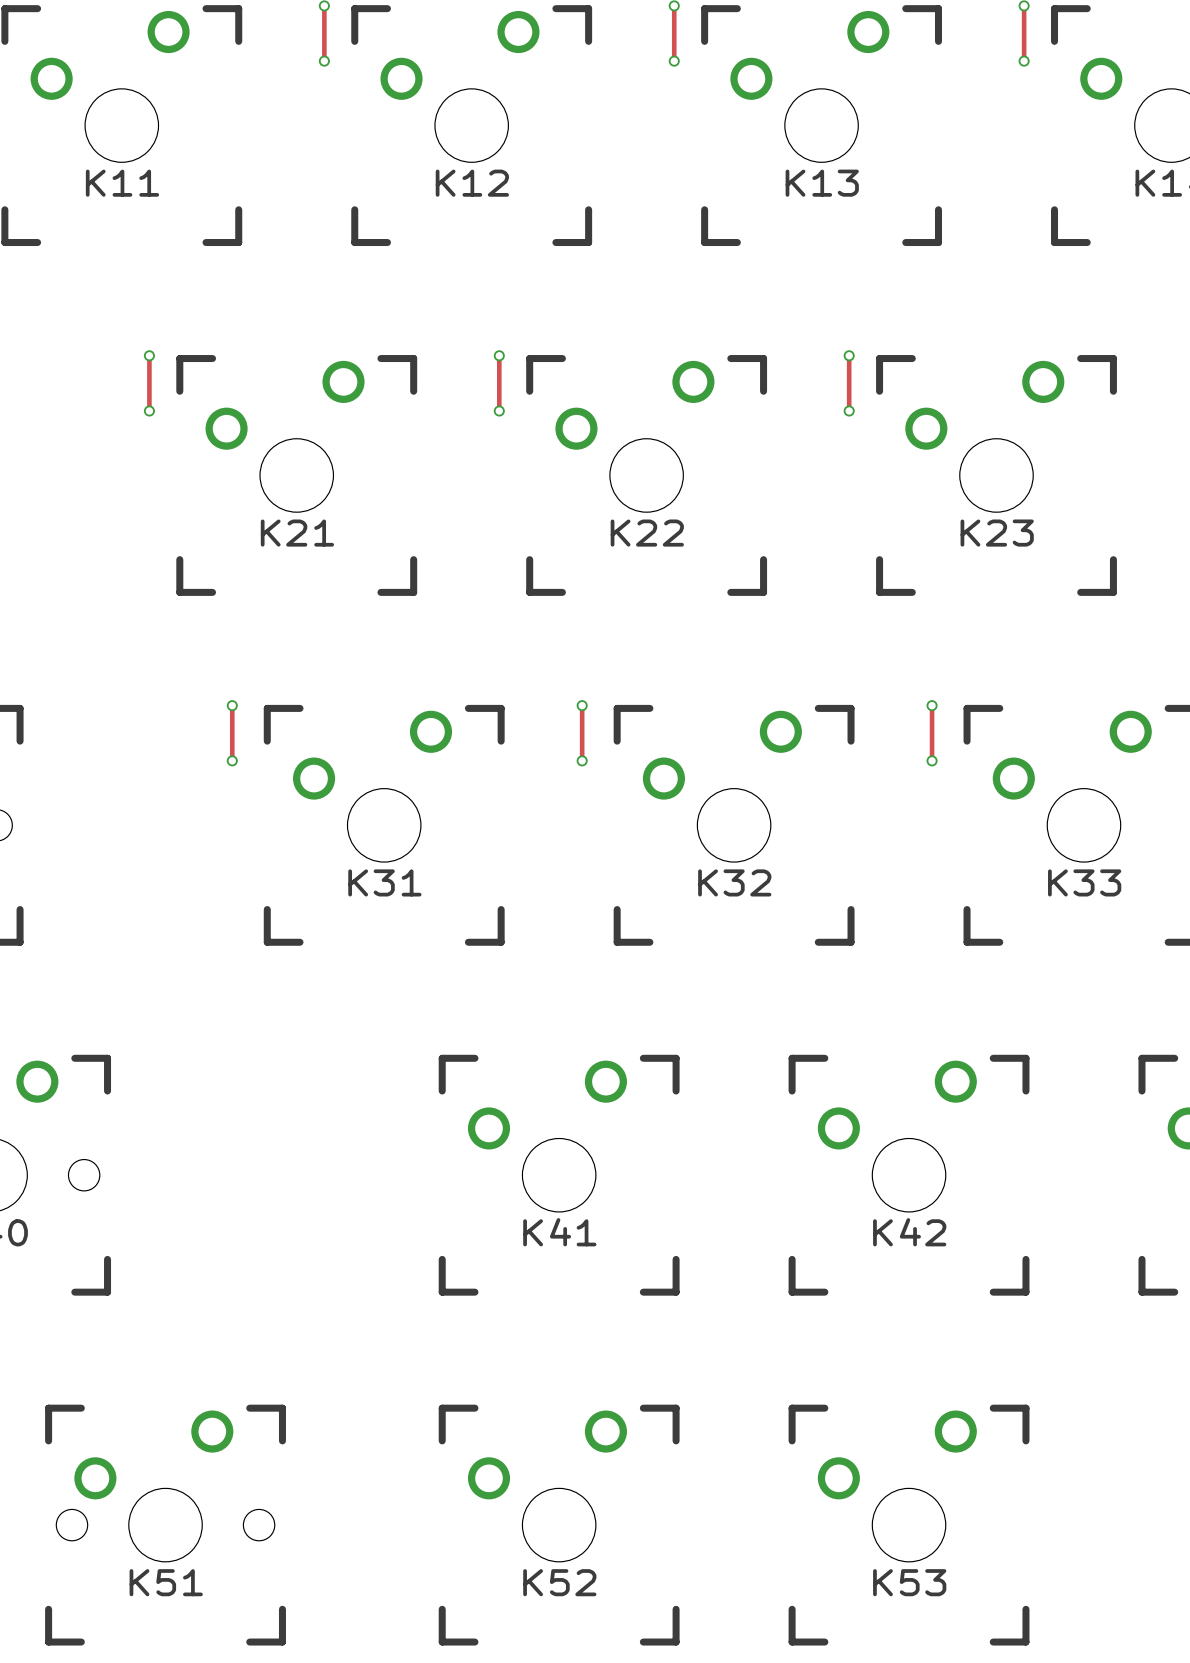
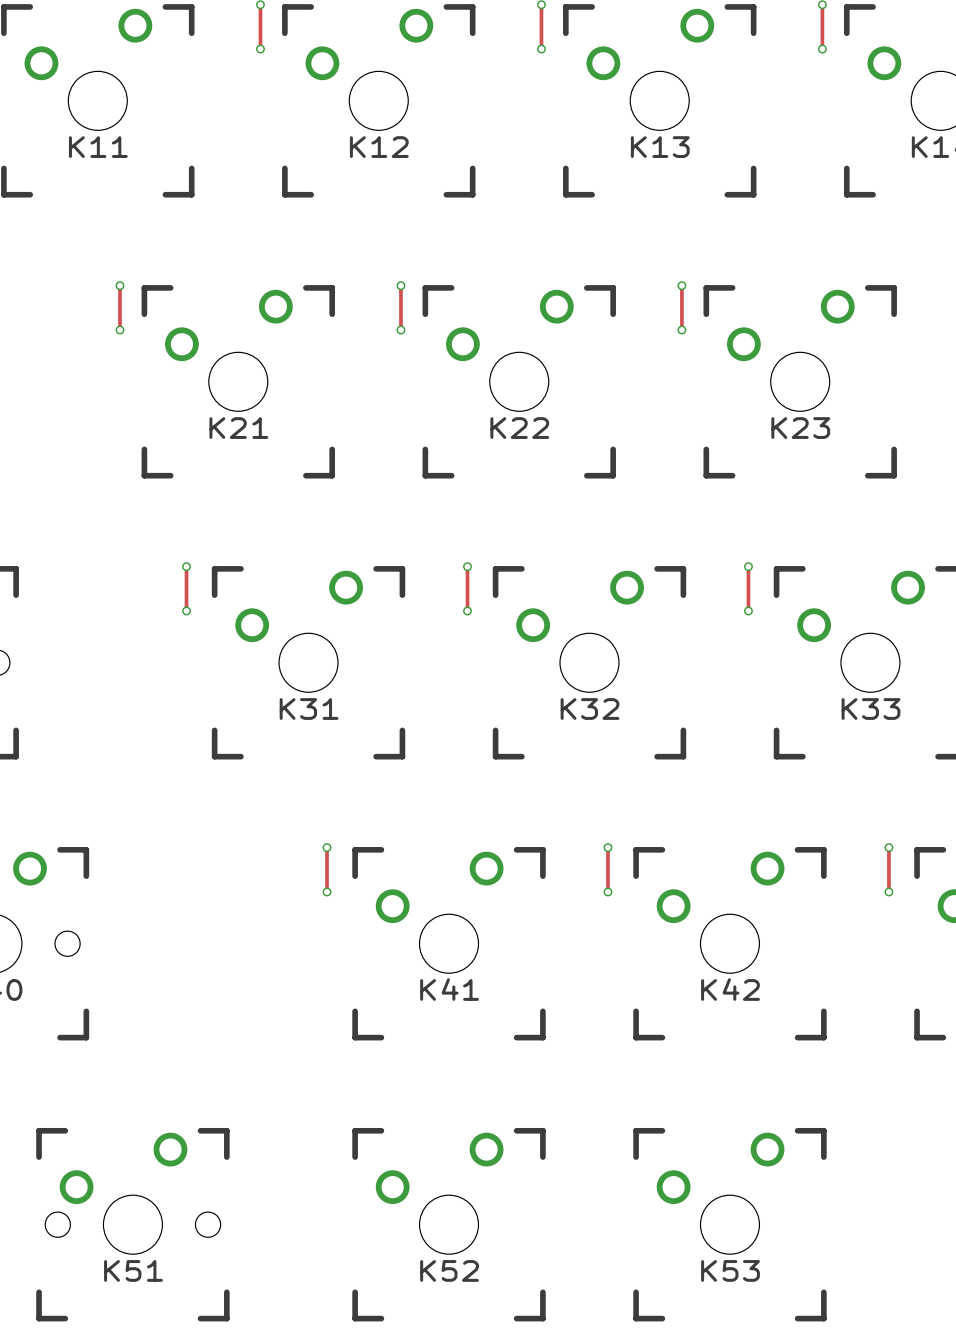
track: none -> (327, 847) (327, 891)
via: none -> (327, 847)
track: none -> (607, 847) (607, 891)
via: none -> (607, 847)
track: none -> (888, 847) (888, 891)
via: none -> (888, 847)
via: none -> (327, 891)
via: none -> (607, 891)
via: none -> (888, 891)

